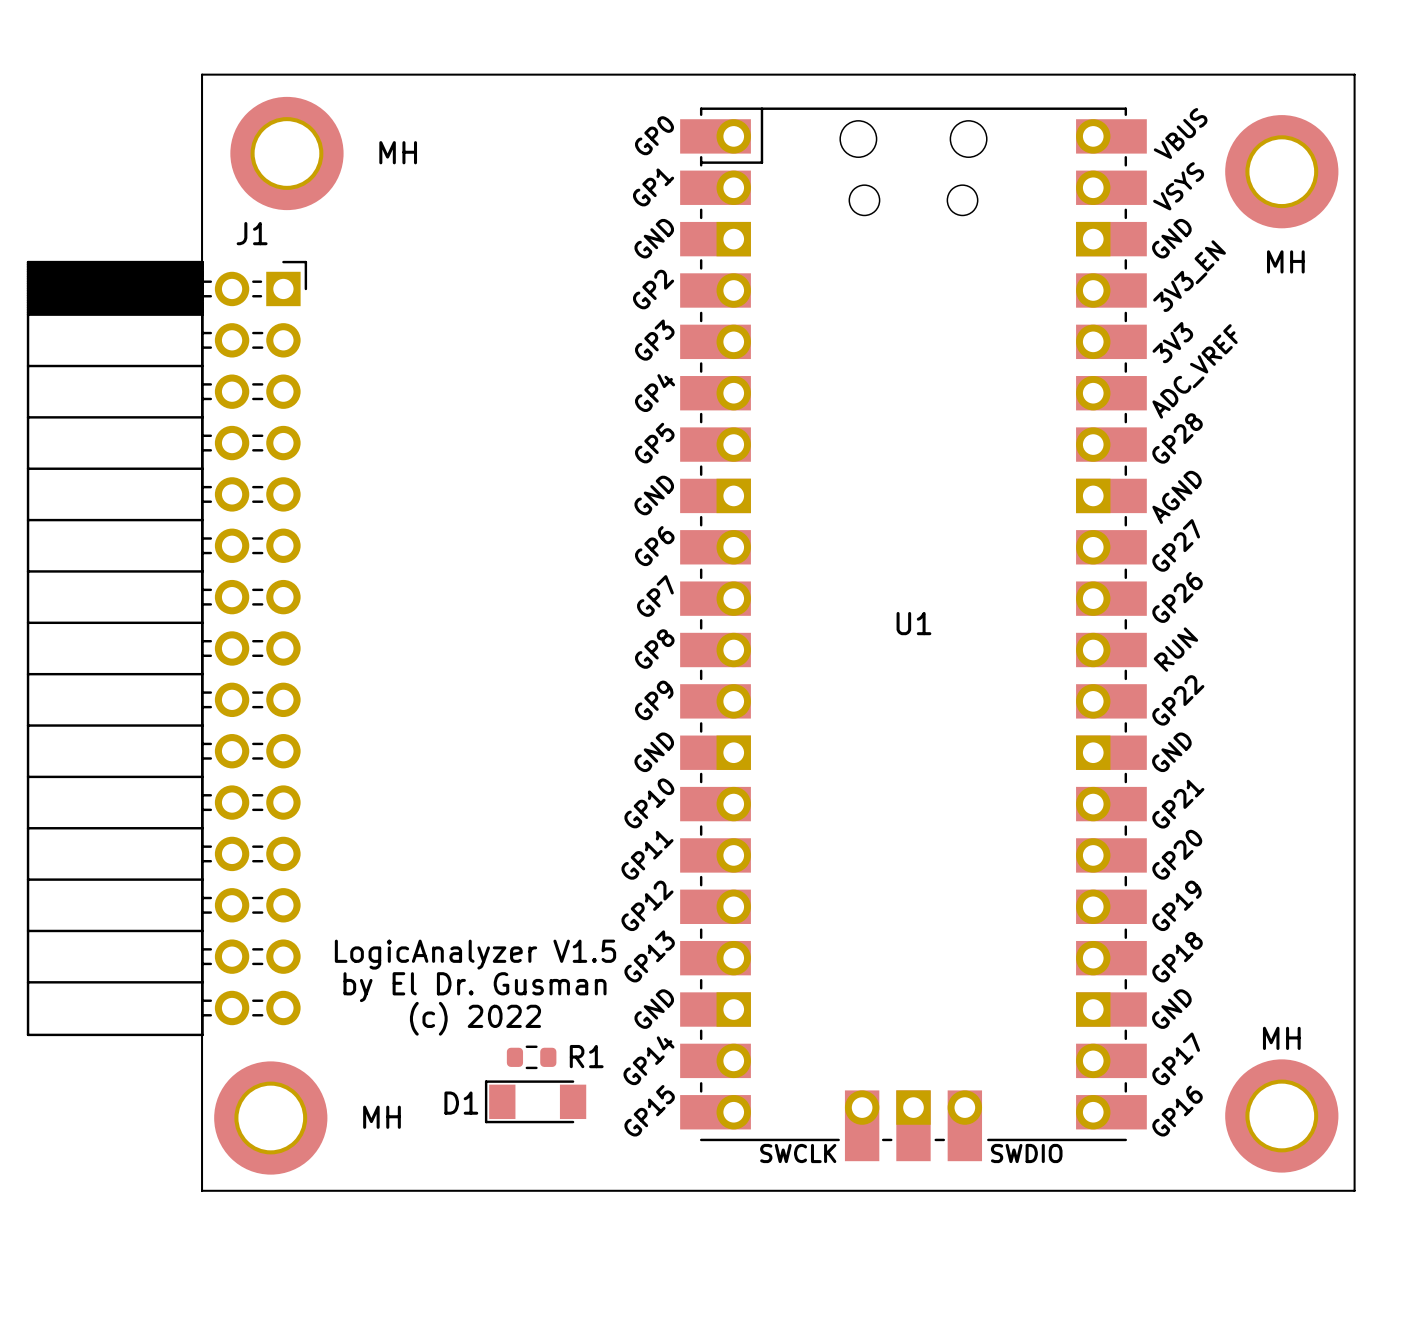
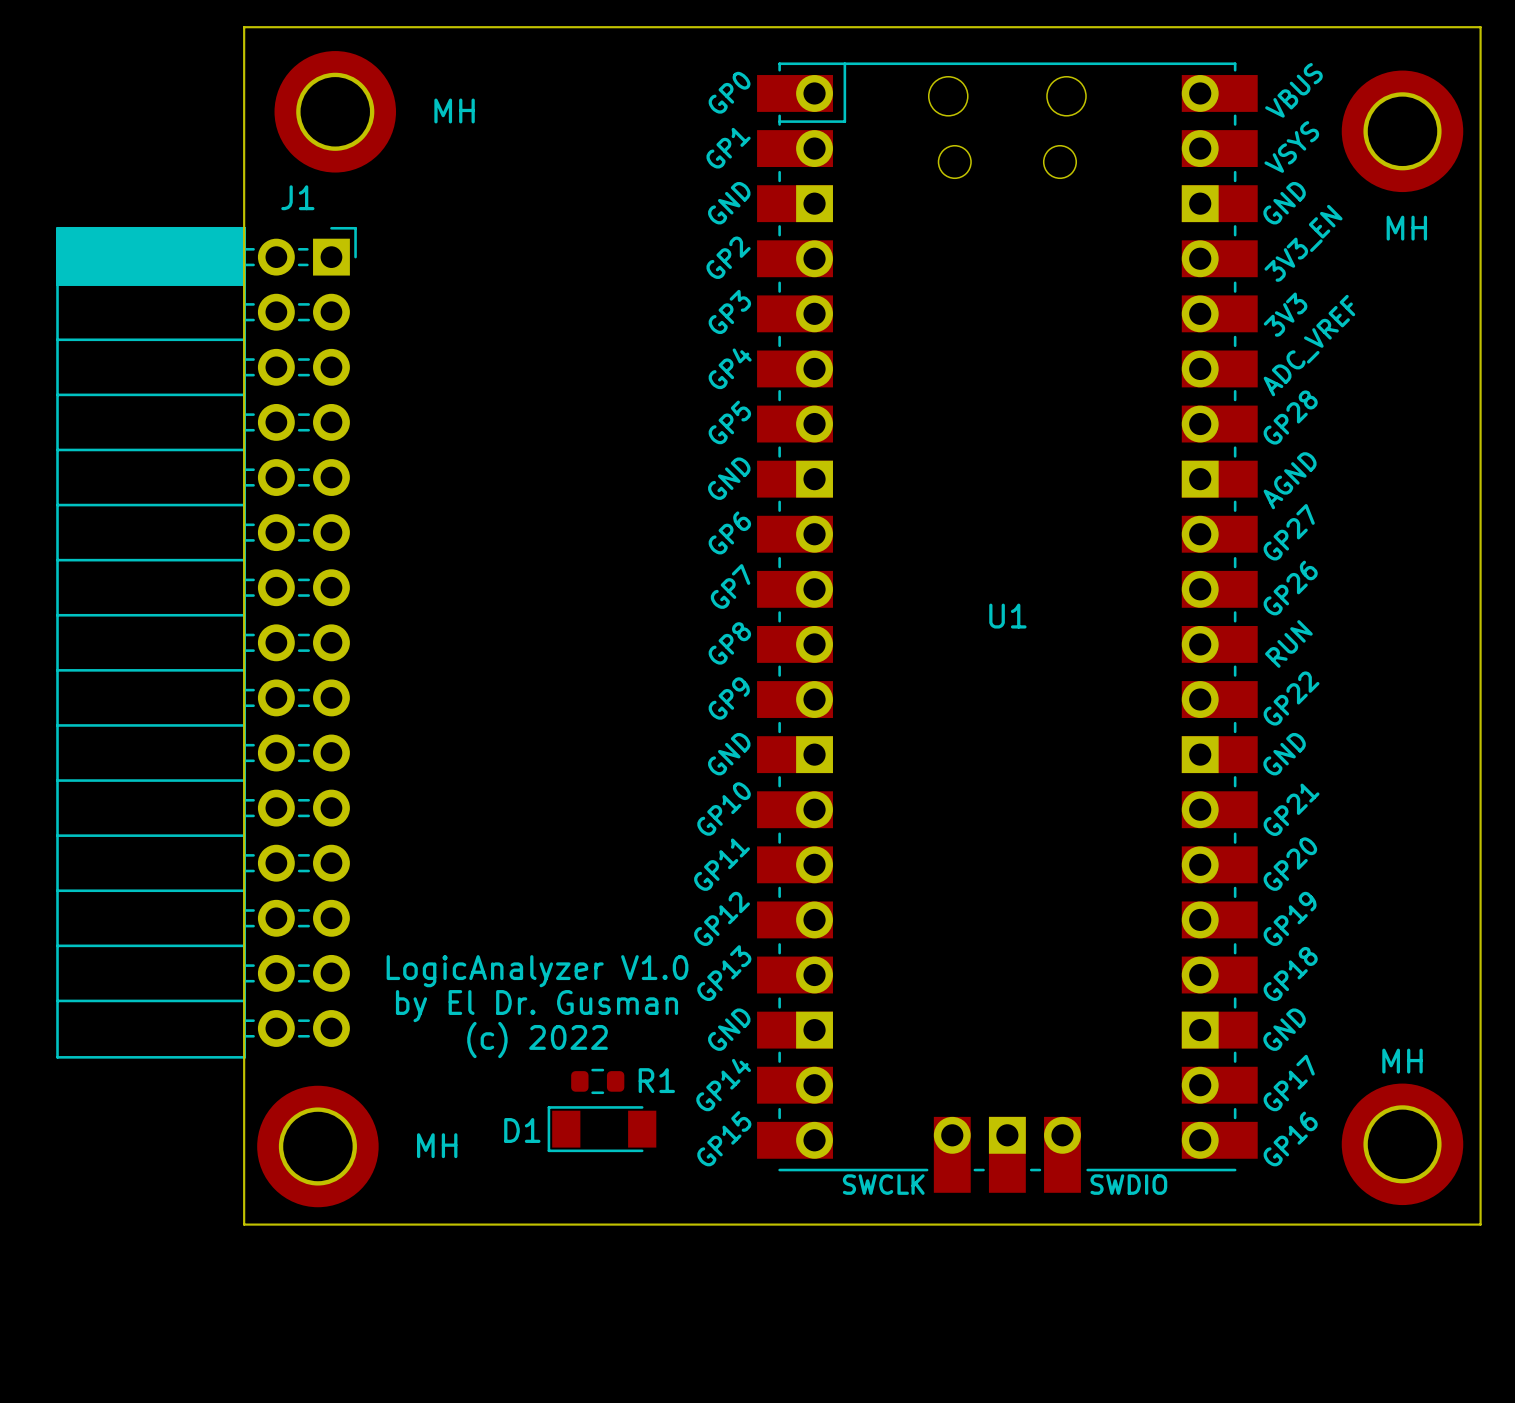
text: LogicAnalyzer V1.5 (475, 954) -> LogicAnalyzer V1.0 (537, 971)

